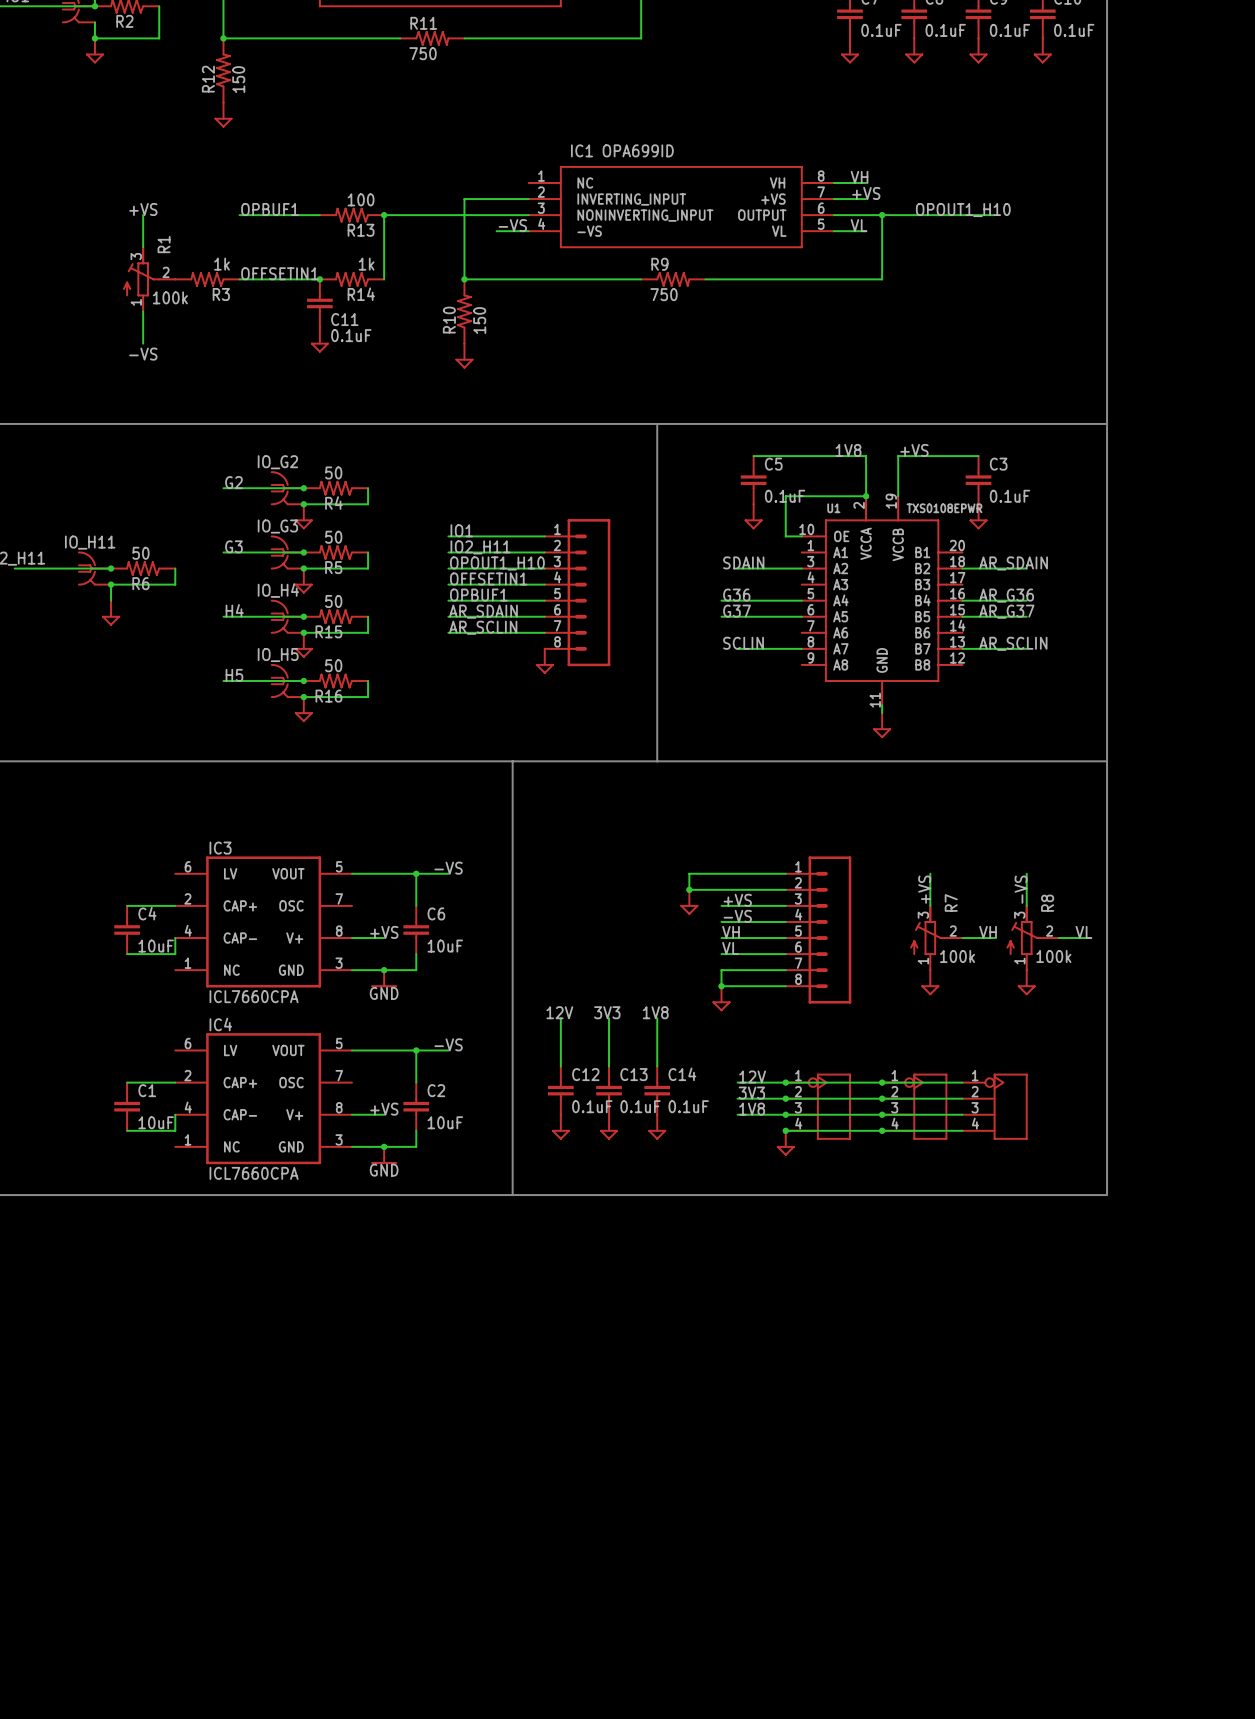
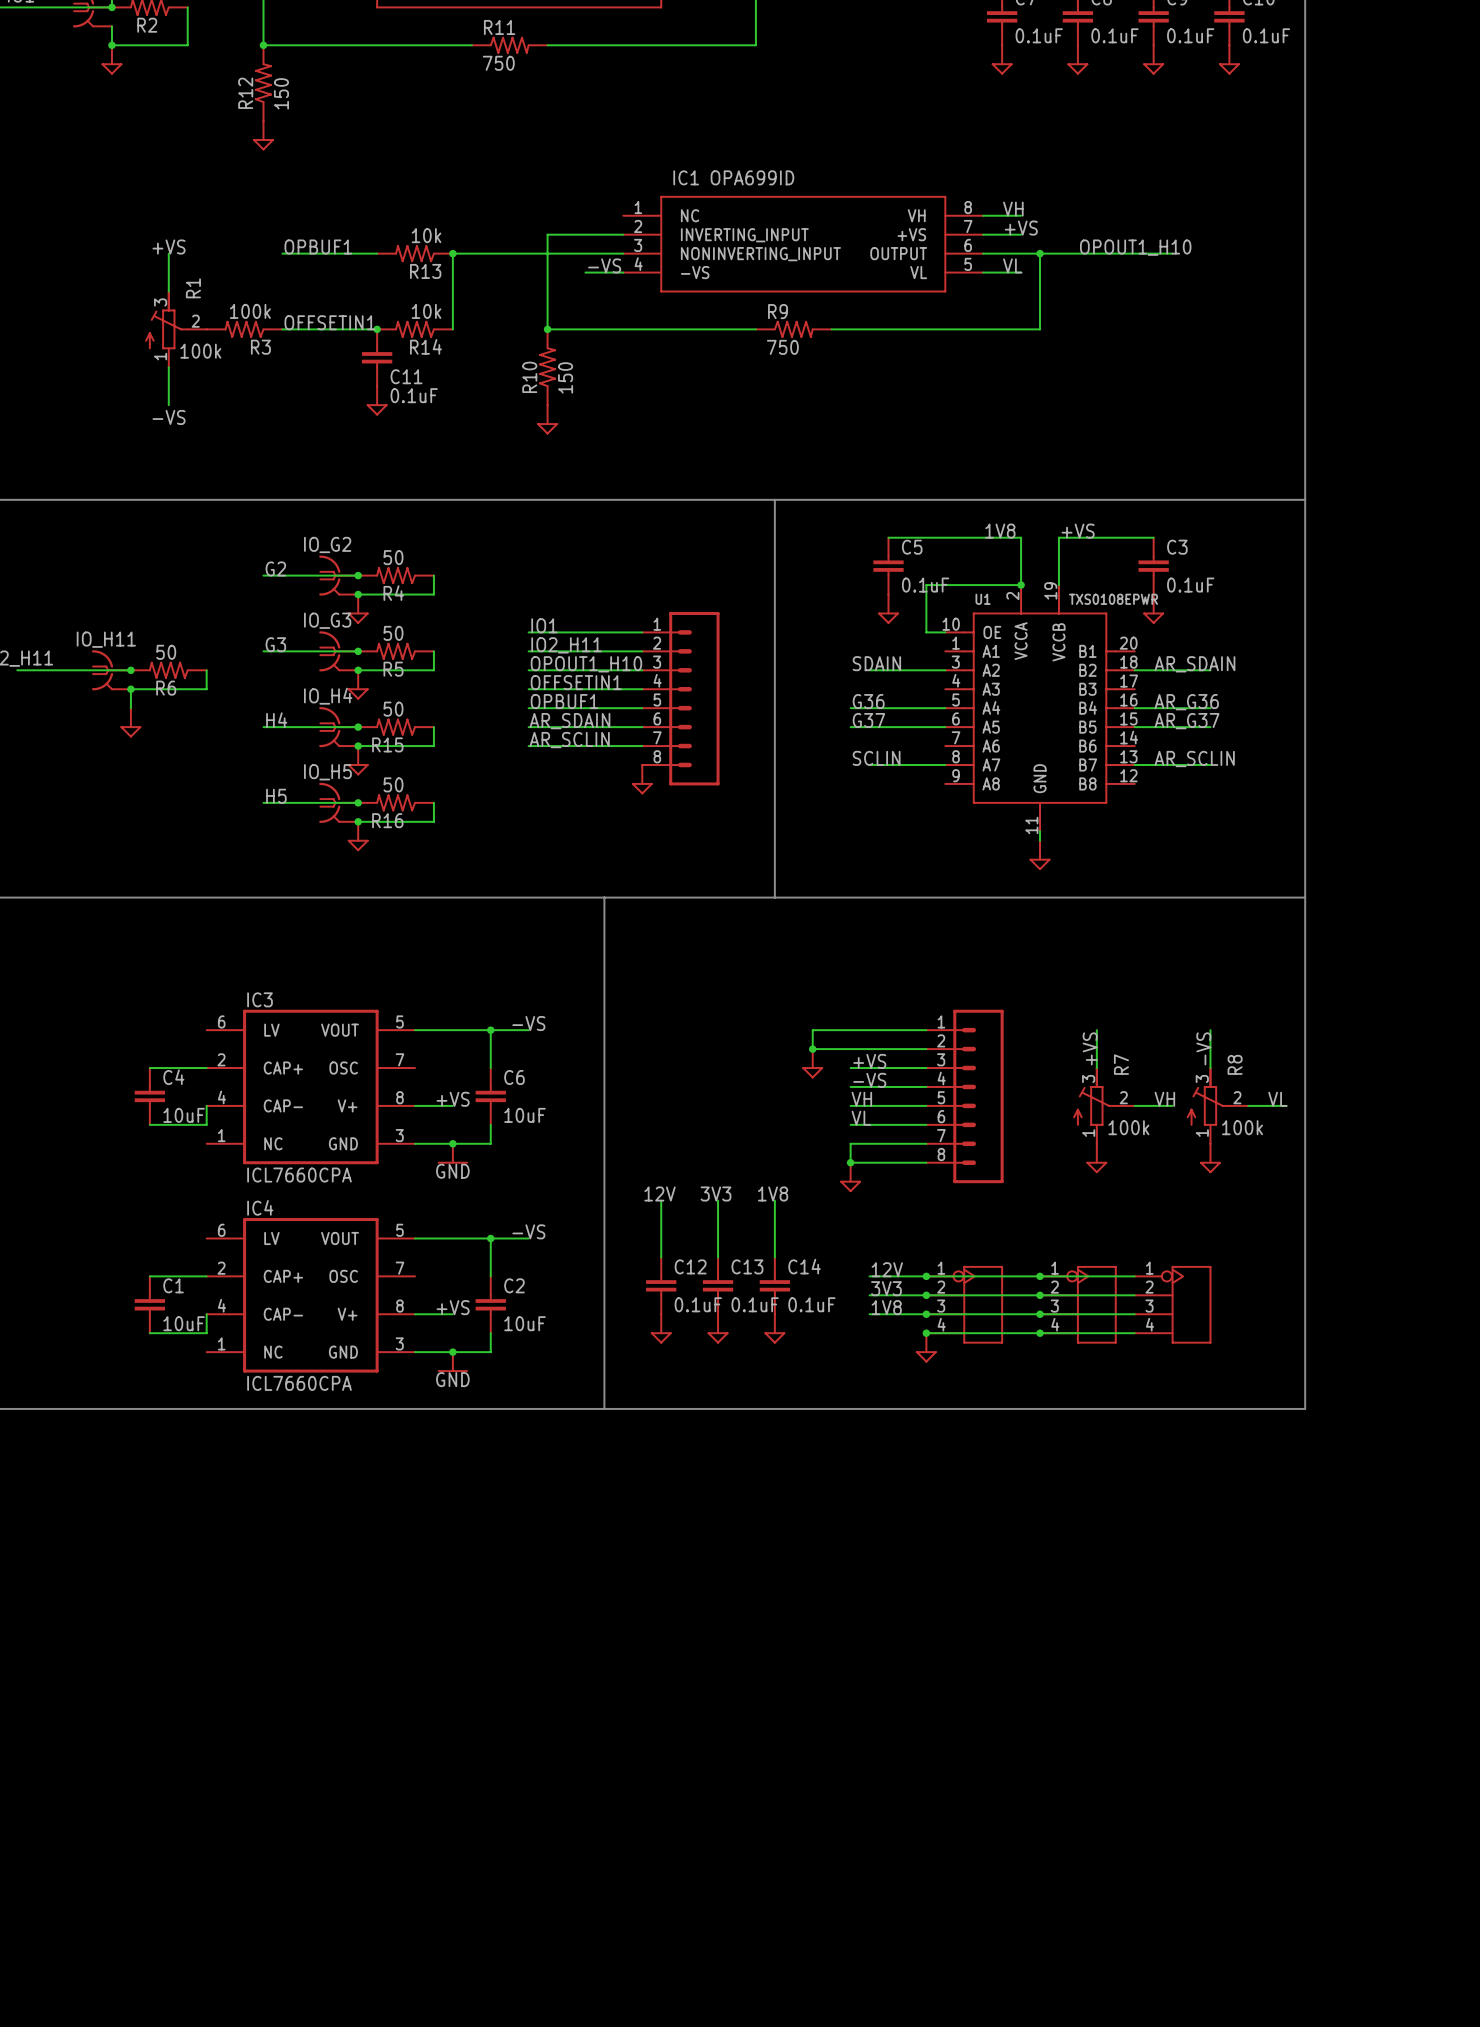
R13 value: 100 (361, 199) -> 10k (426, 235)
R3 value: 1k (222, 264) -> 100k (250, 311)
R14 value: 1k (366, 264) -> 10k (426, 311)

